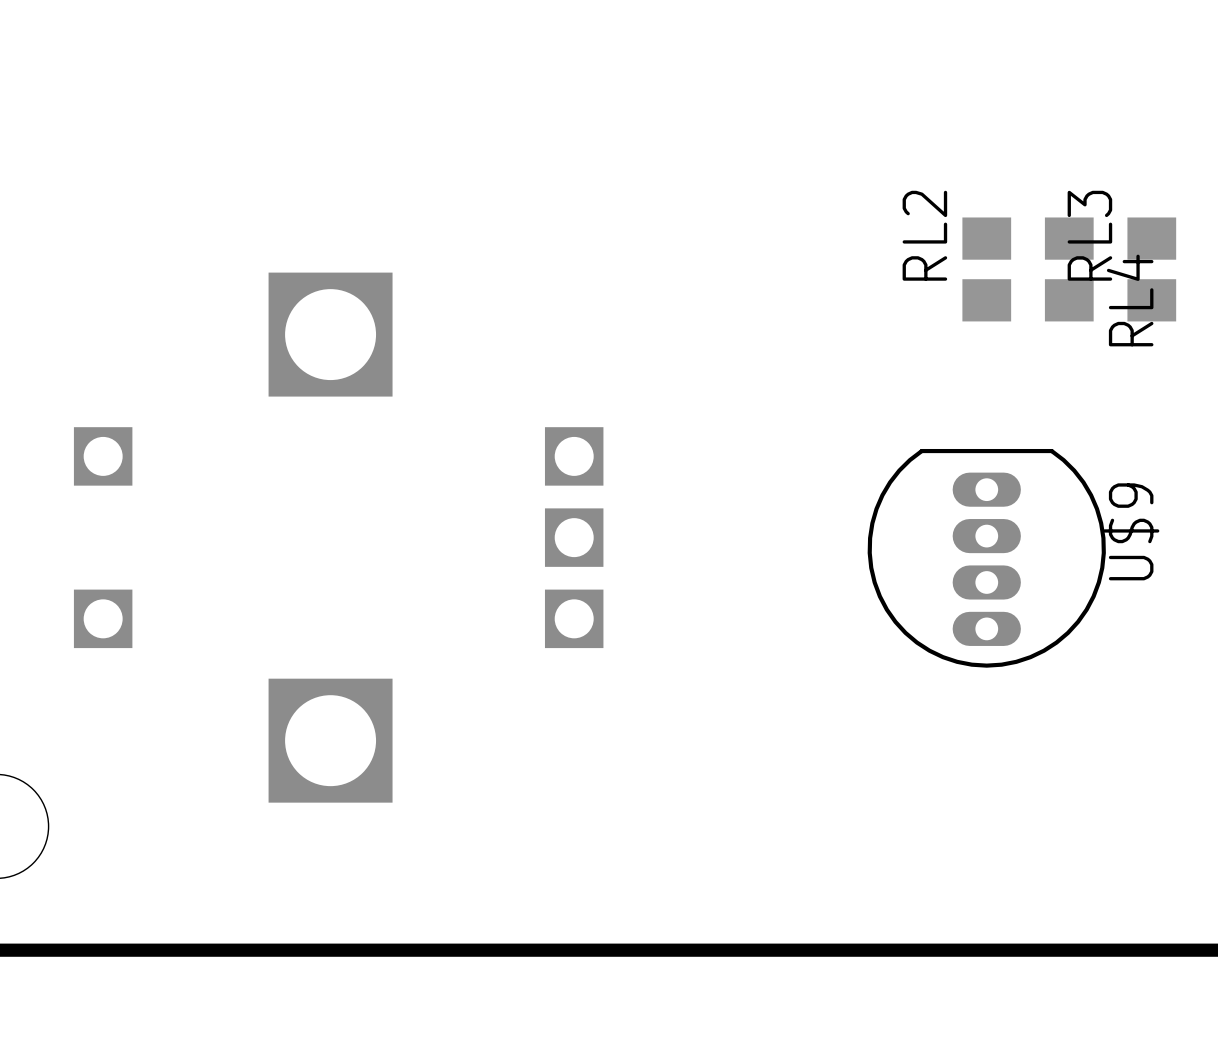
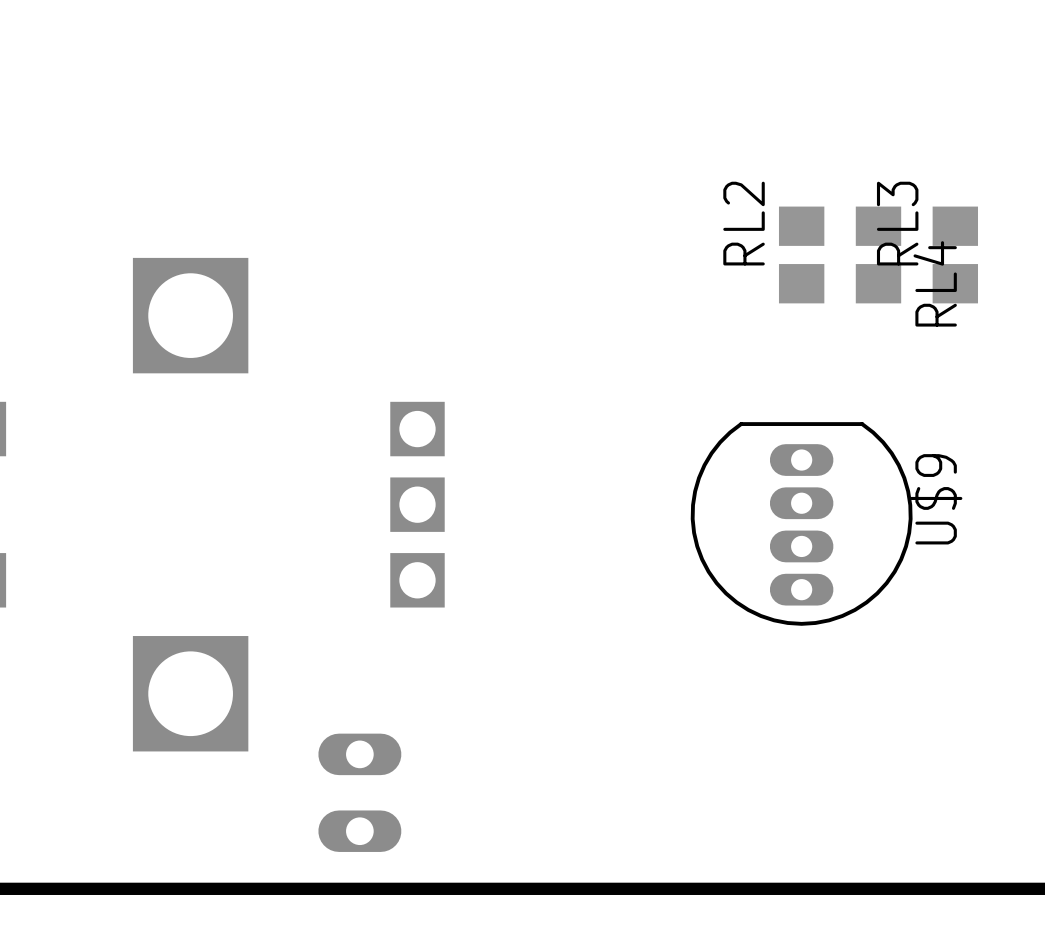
part: none -> (359, 792)

